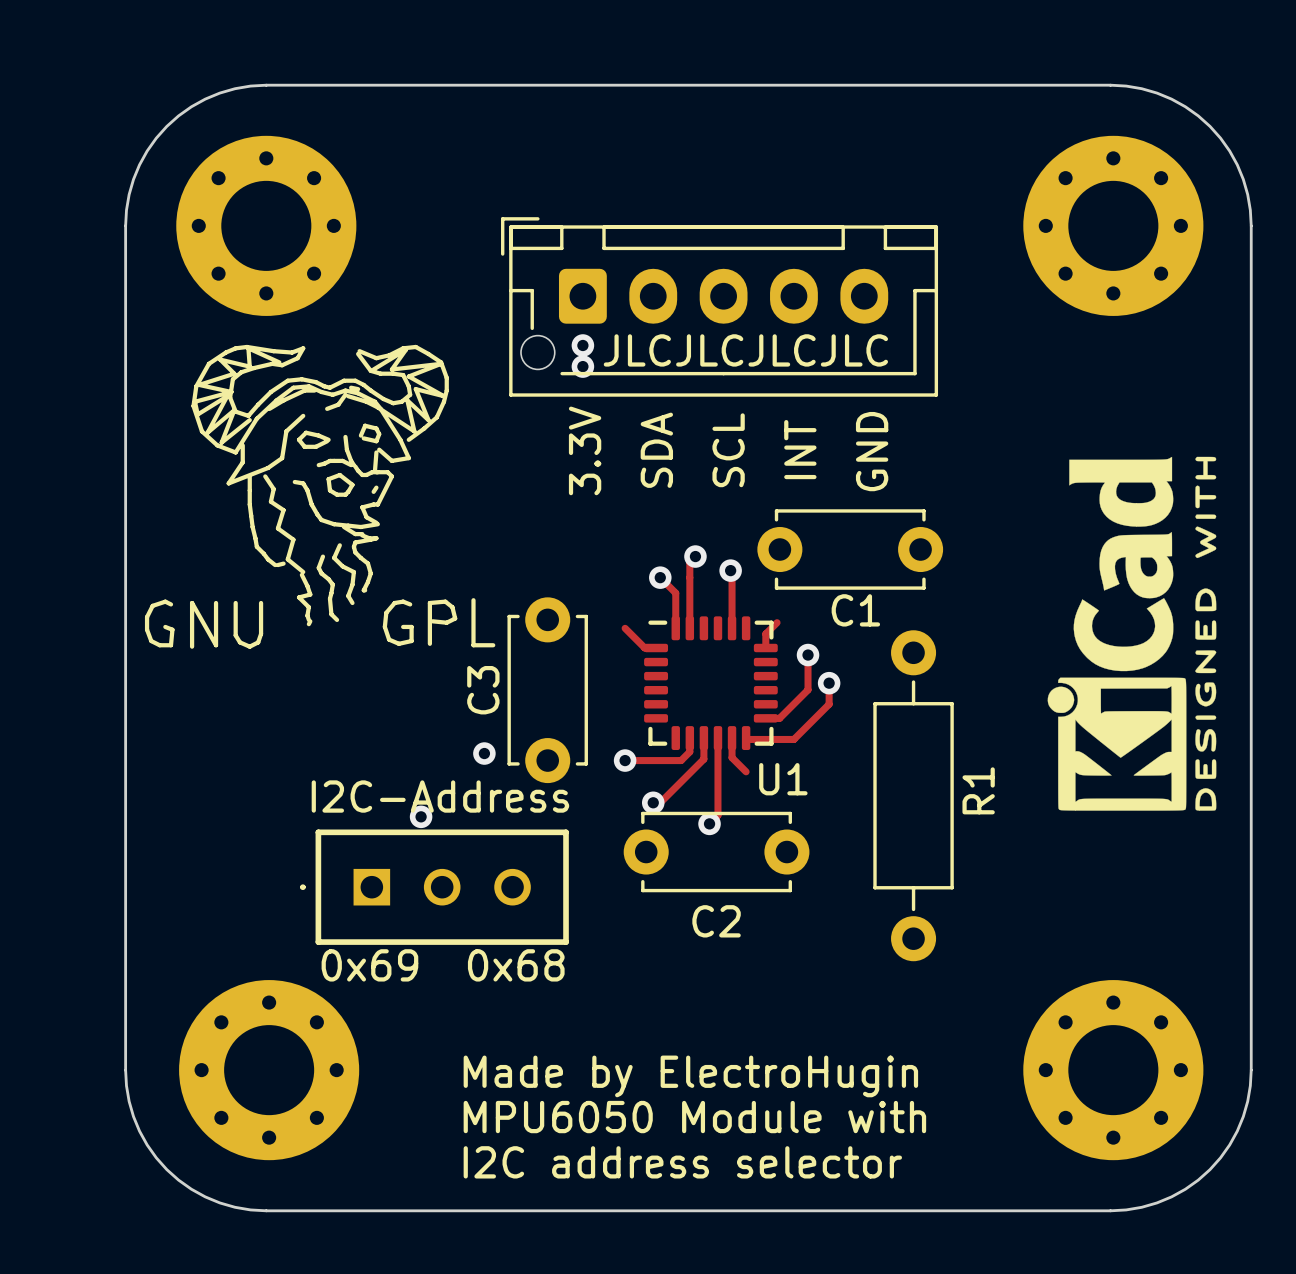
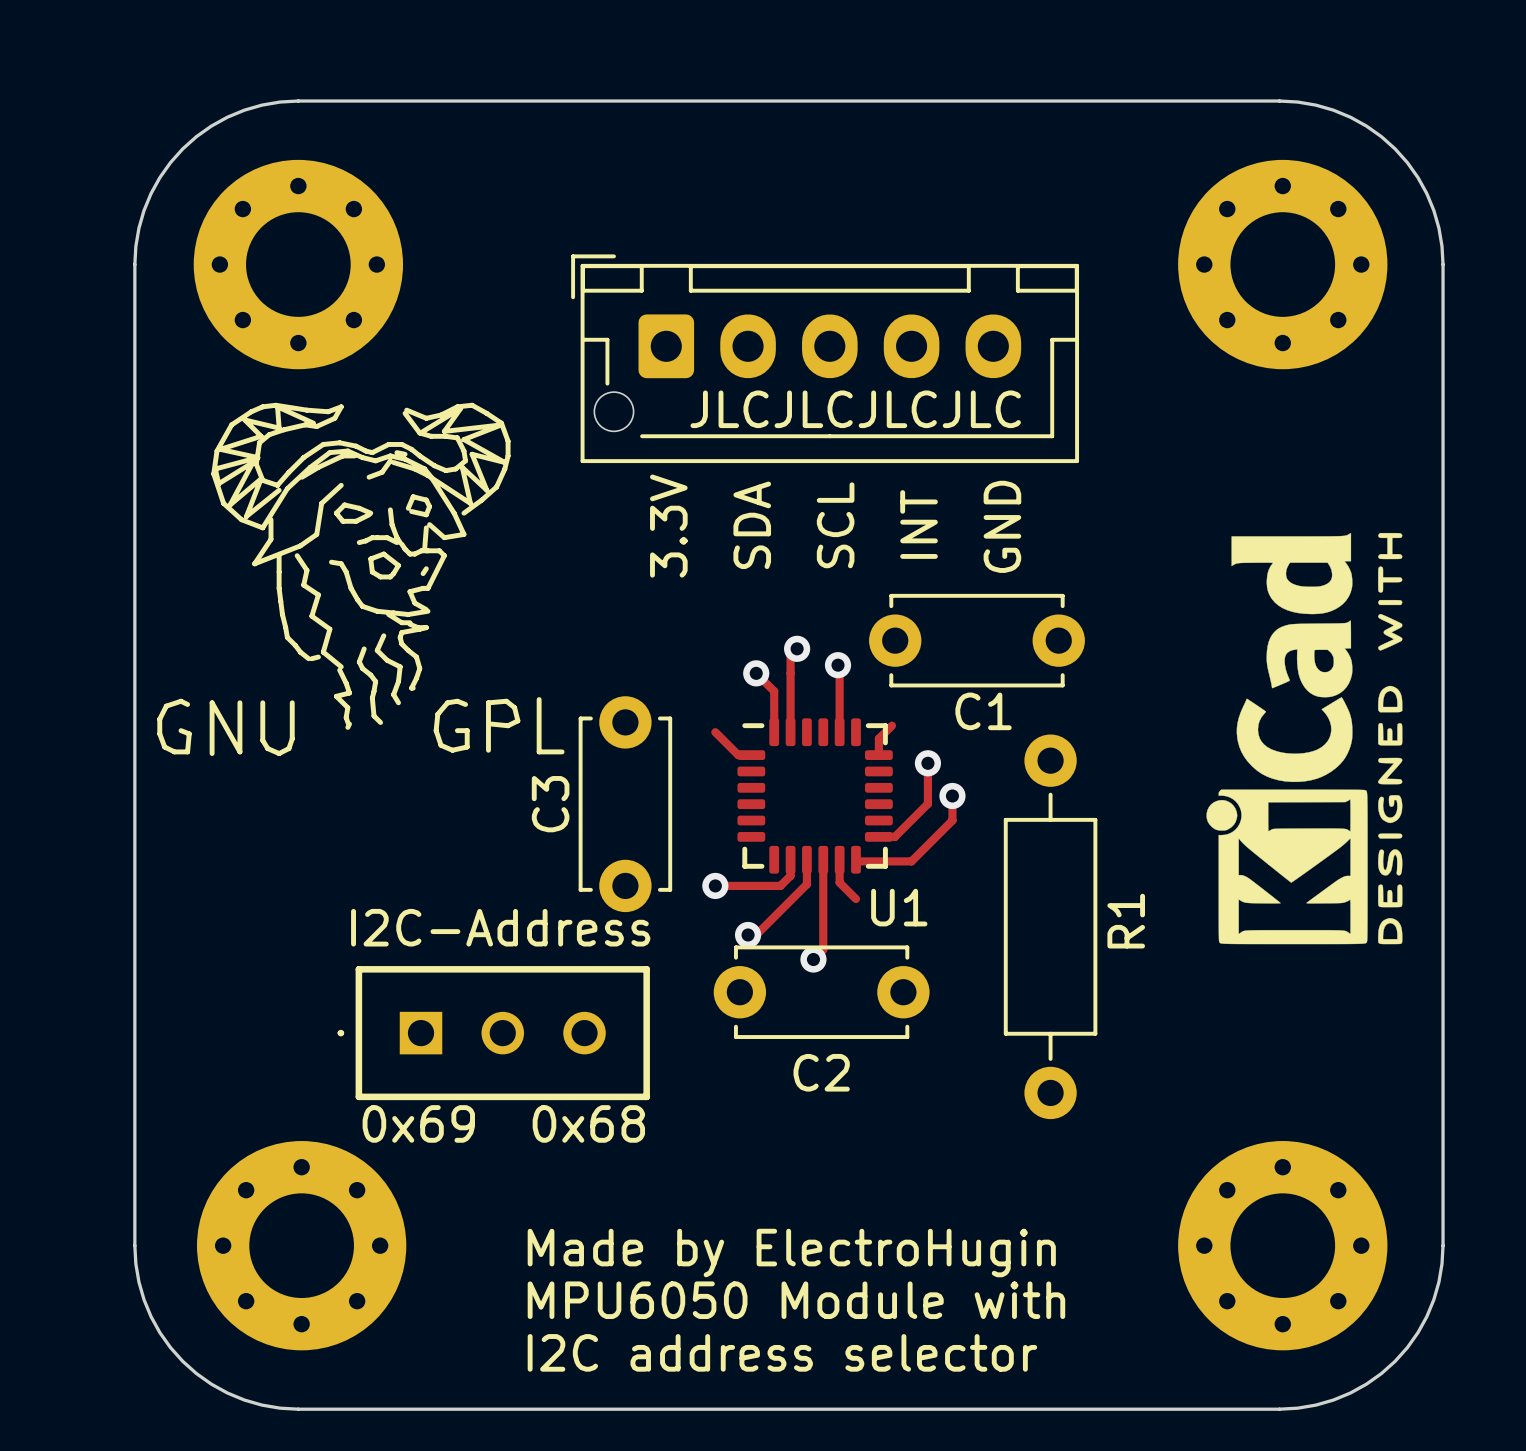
via: (582, 345) -> none
via: (582, 366) -> none
via: (484, 753) -> none
via: (421, 816) -> none

